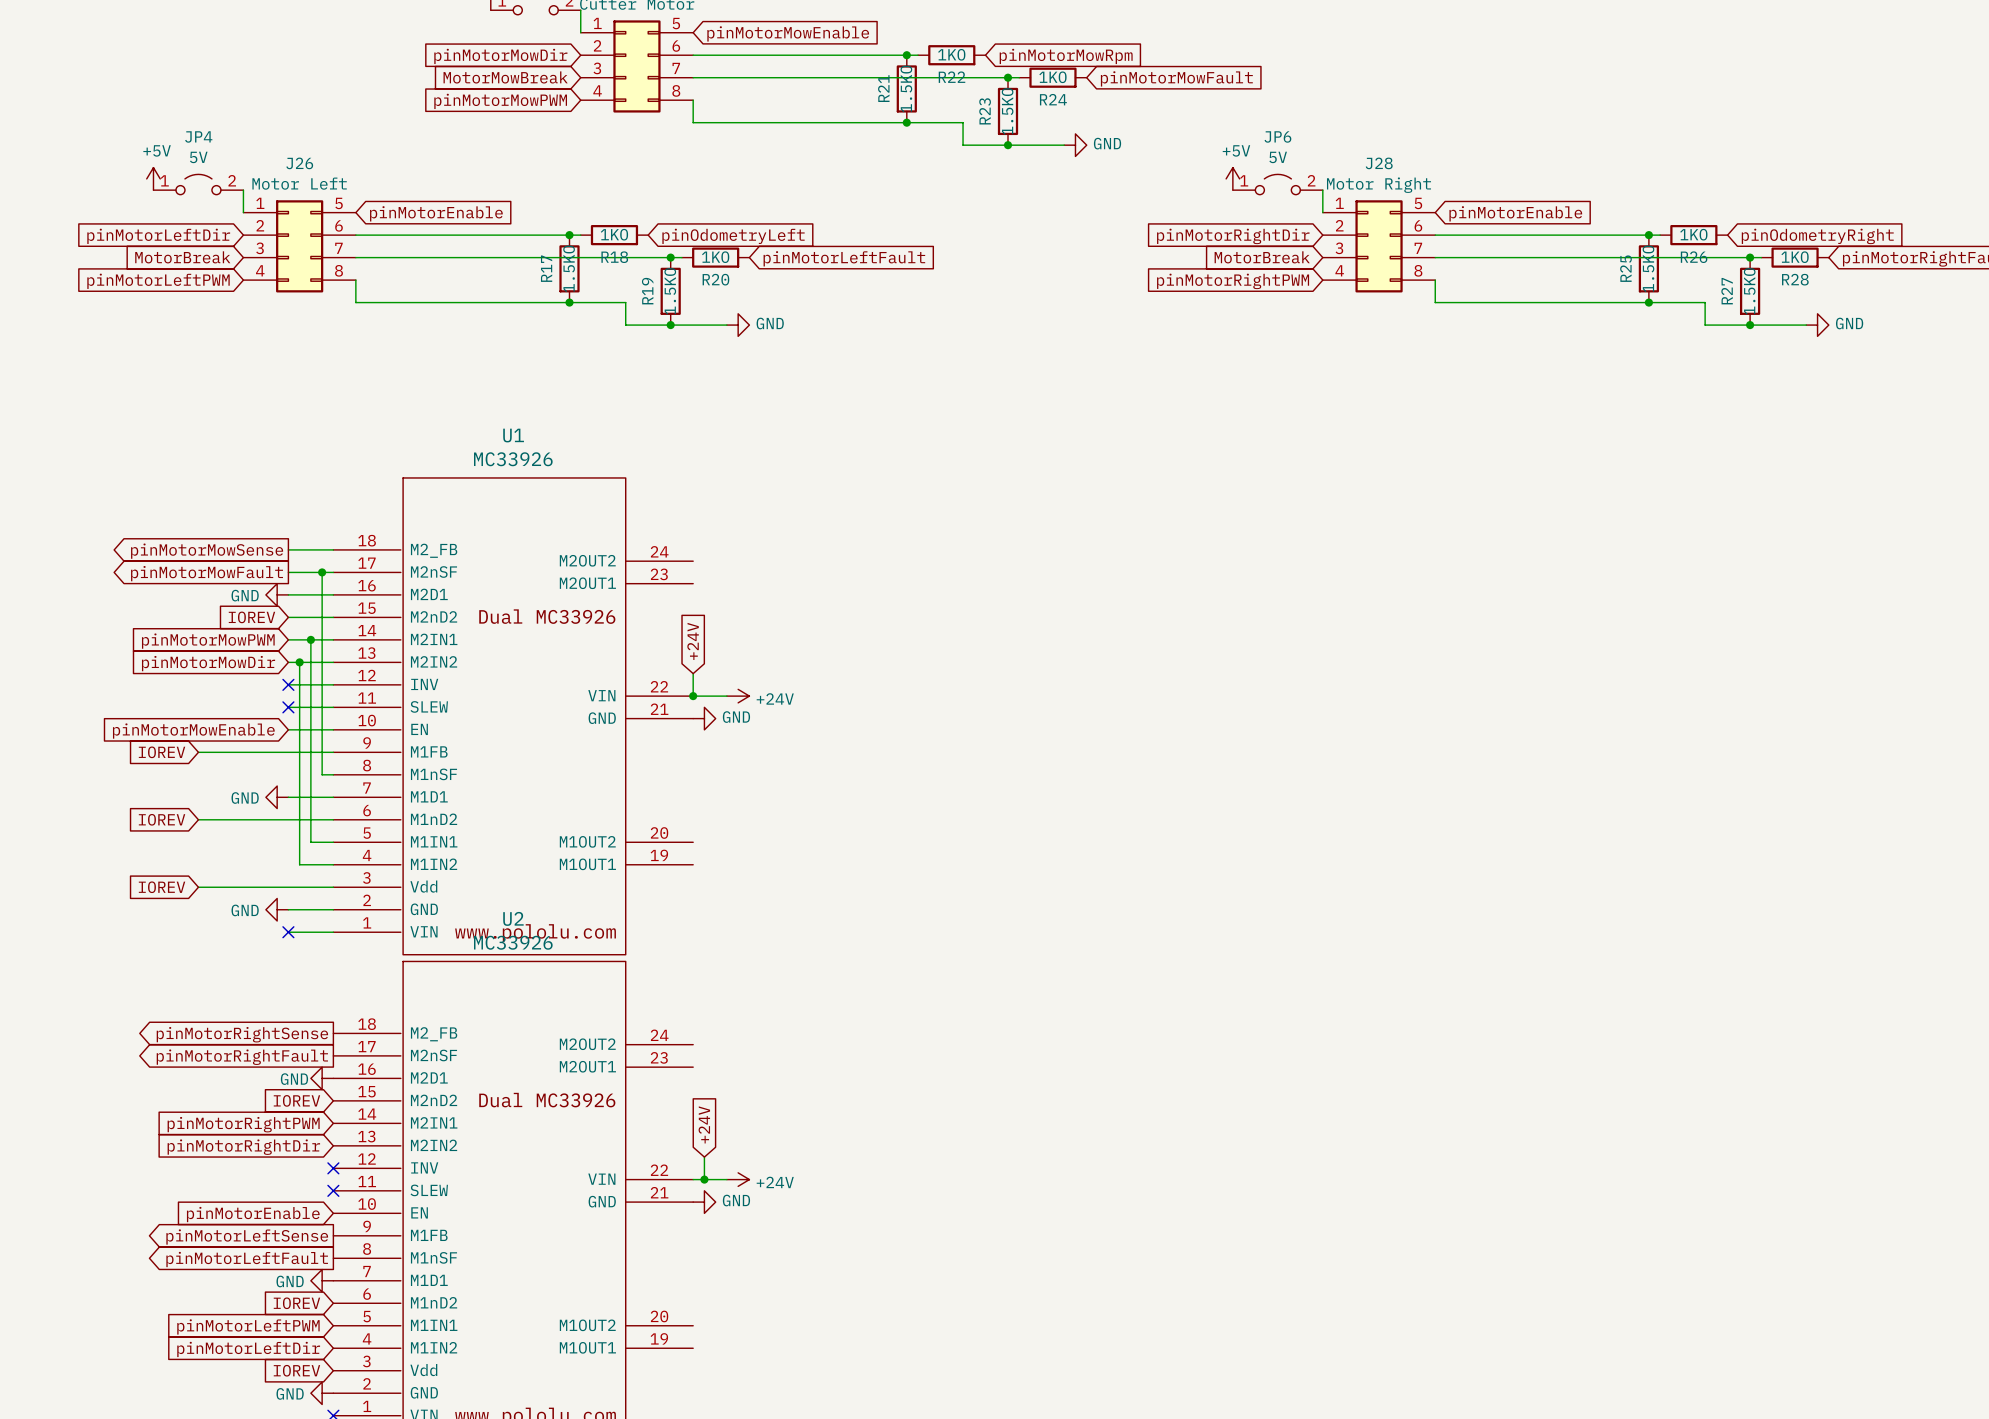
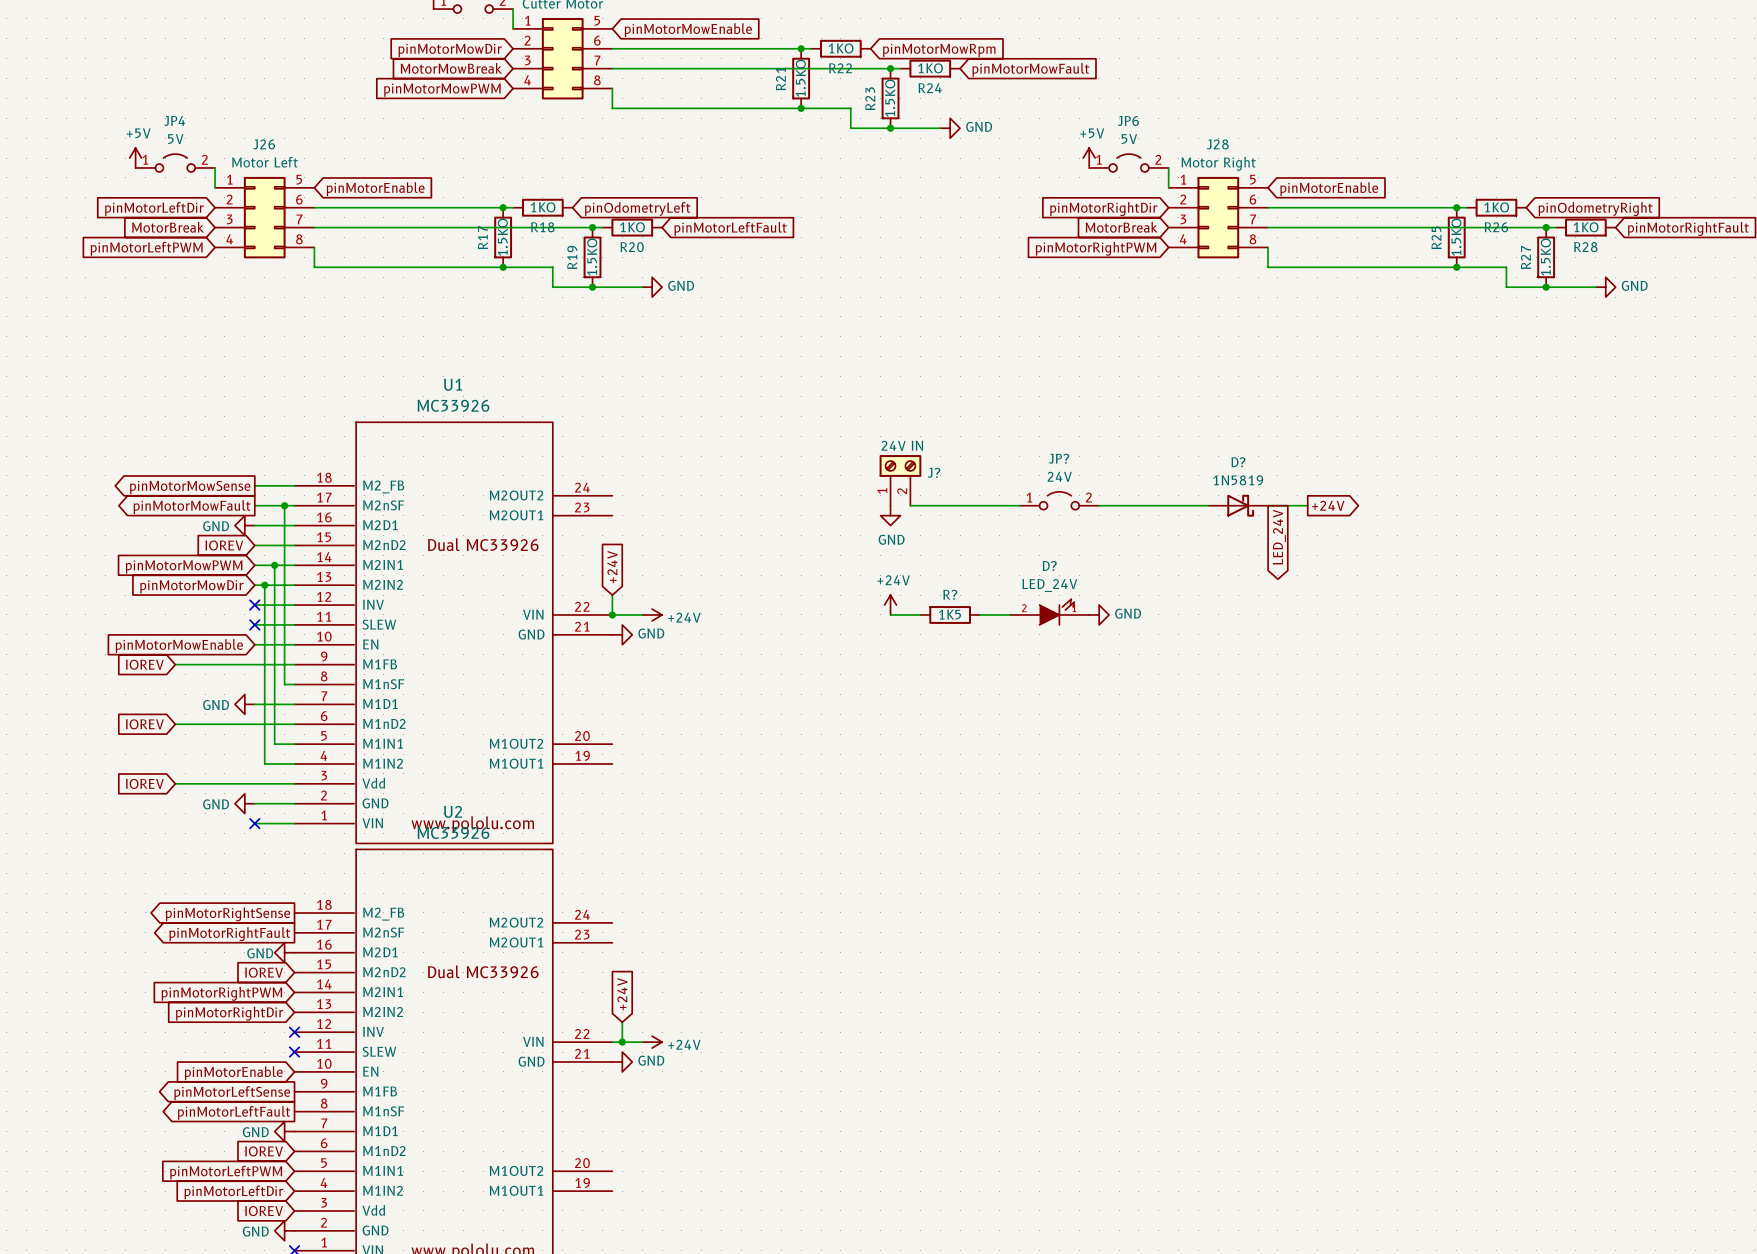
J?: none -> 24V IN (900, 480)
JP?: none -> 24V (1059, 500)
wire: none -> (910, 505) (1019, 505)
wire: none -> (1099, 505) (1208, 505)
D?: none -> 1N5819 (1238, 505)
wire: none -> (1268, 505) (1307, 505)
global label: none -> +24V (1328, 505)
power symbol: none -> GND (890, 515)
global label: none -> LED_24V (1279, 537)
power symbol: none -> +24V (890, 605)
D?: none -> LED_24V (1049, 612)
wire: none -> (890, 614) (920, 614)
R?: none -> 1K5 (950, 614)
wire: none -> (979, 614) (1009, 614)
power symbol: none -> GND (1099, 614)

